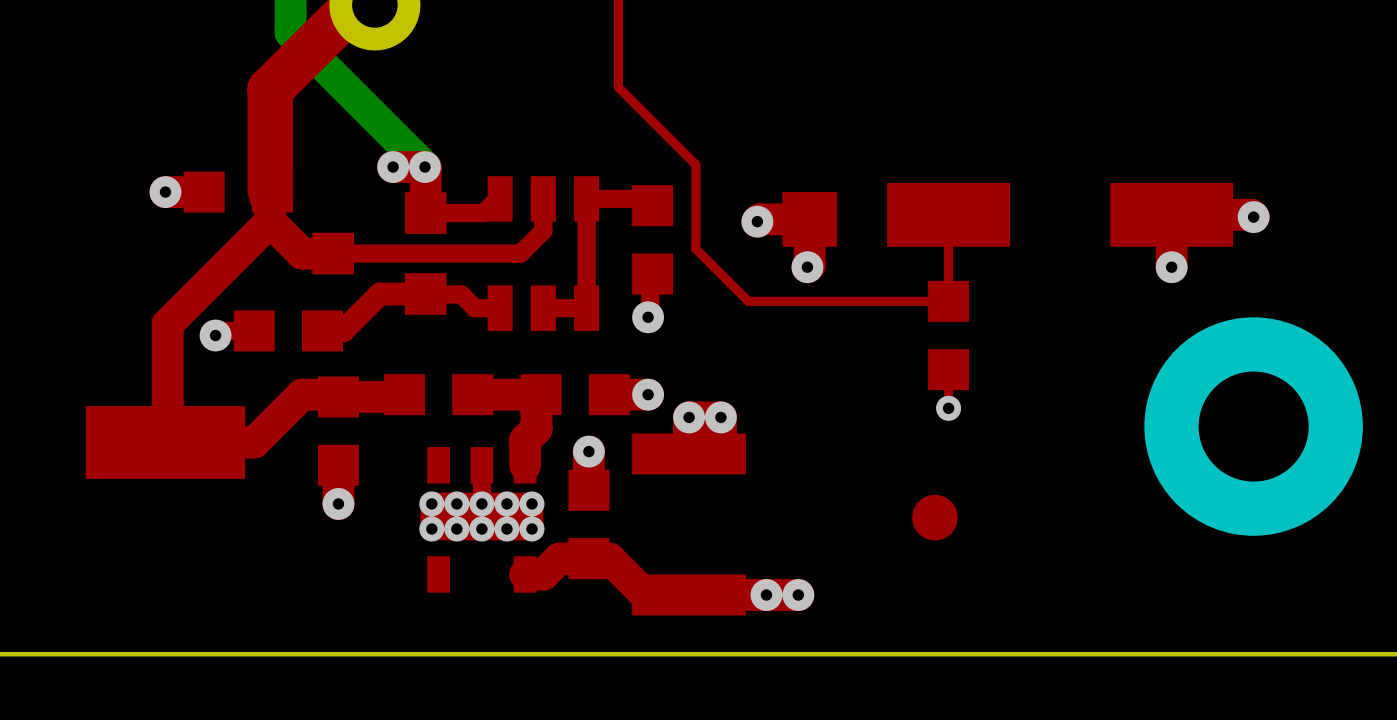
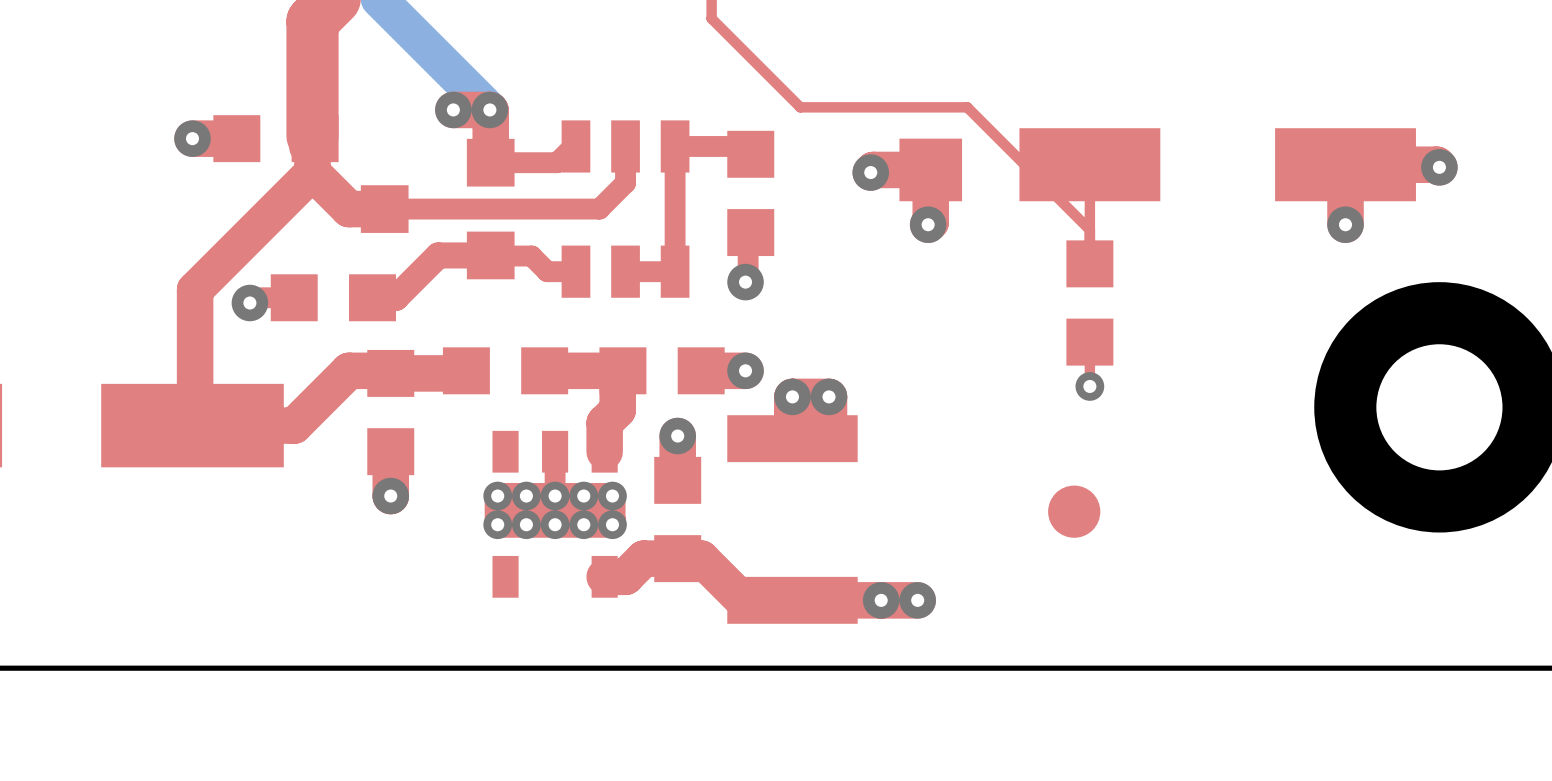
top track: (695, 164) (695, 248) (748, 301) (948, 301) -> (800, 107) (967, 107) (1089, 229)

